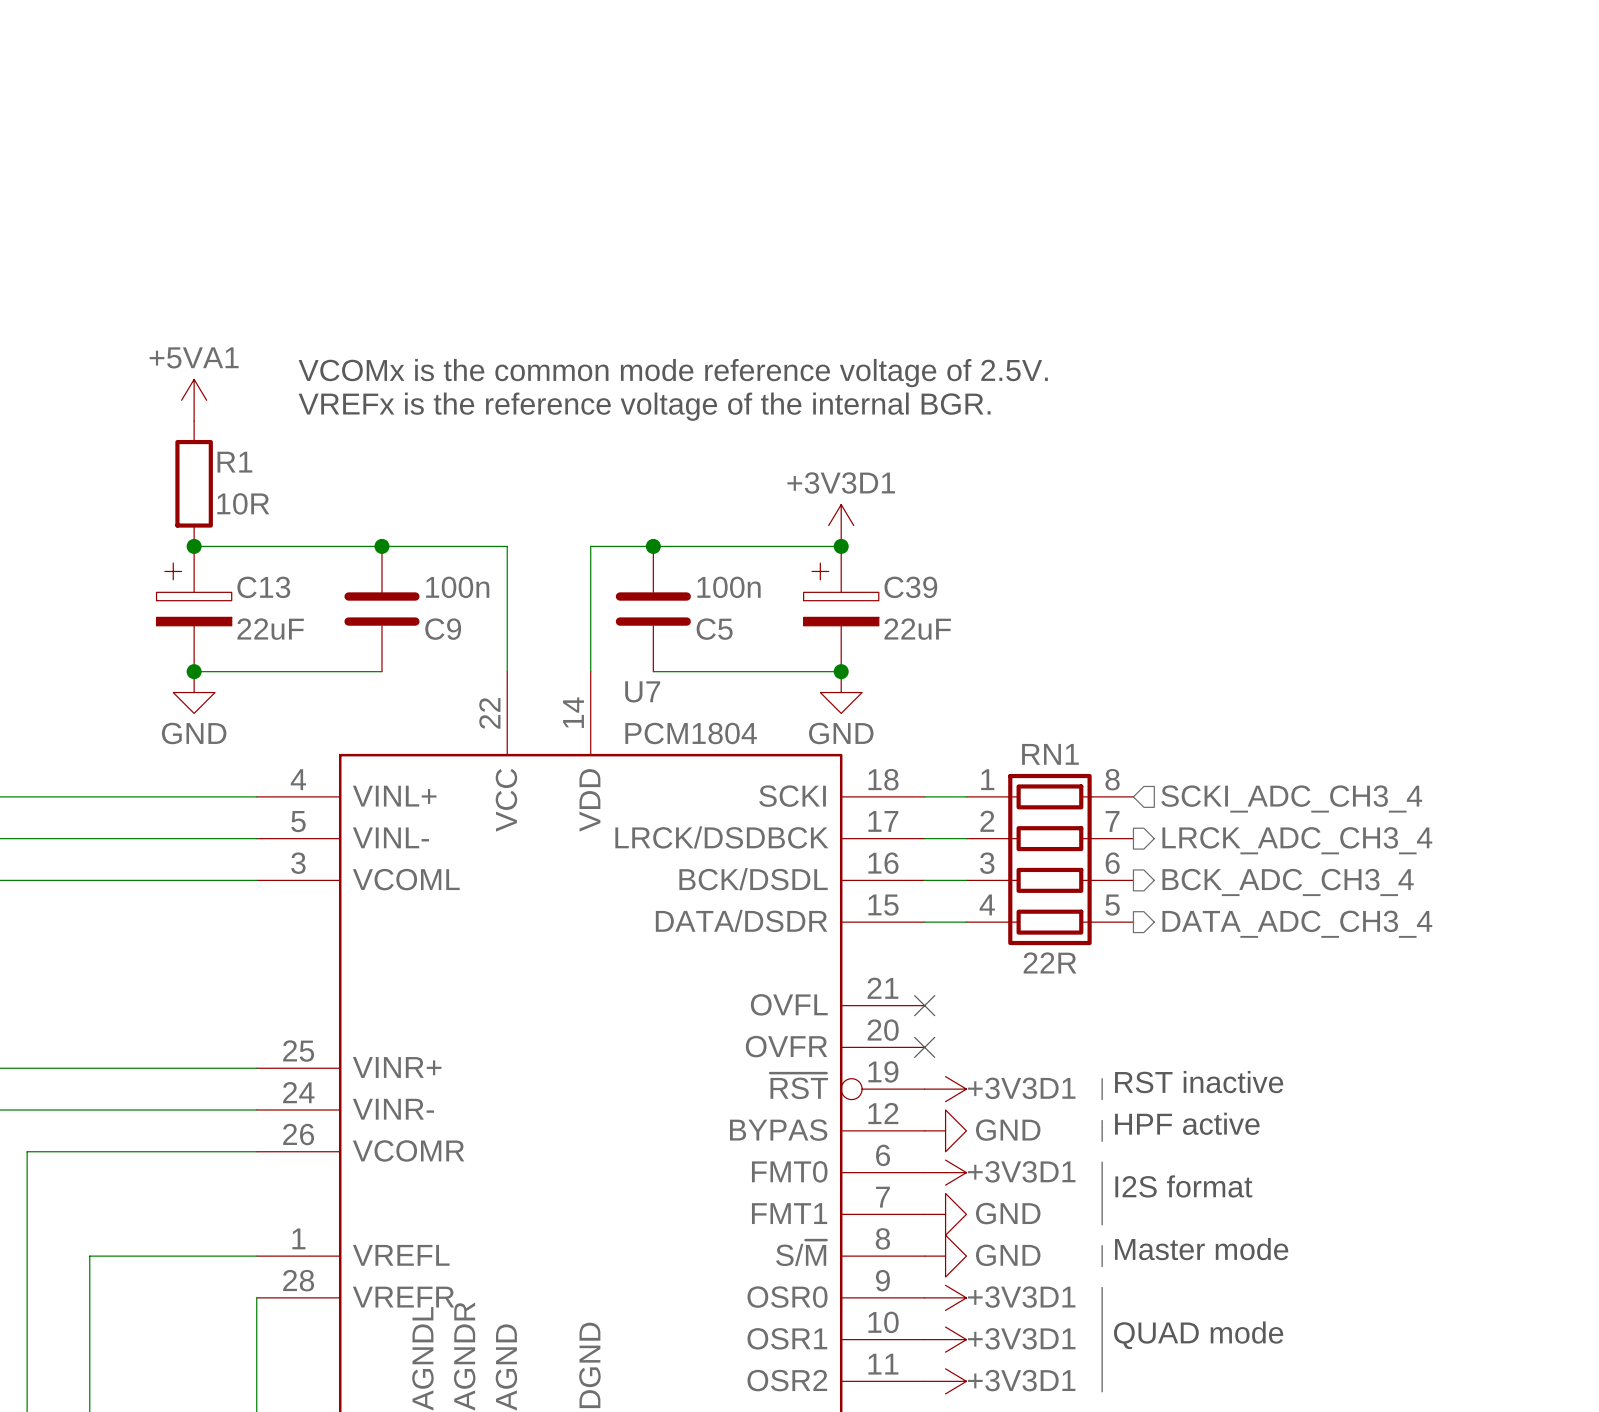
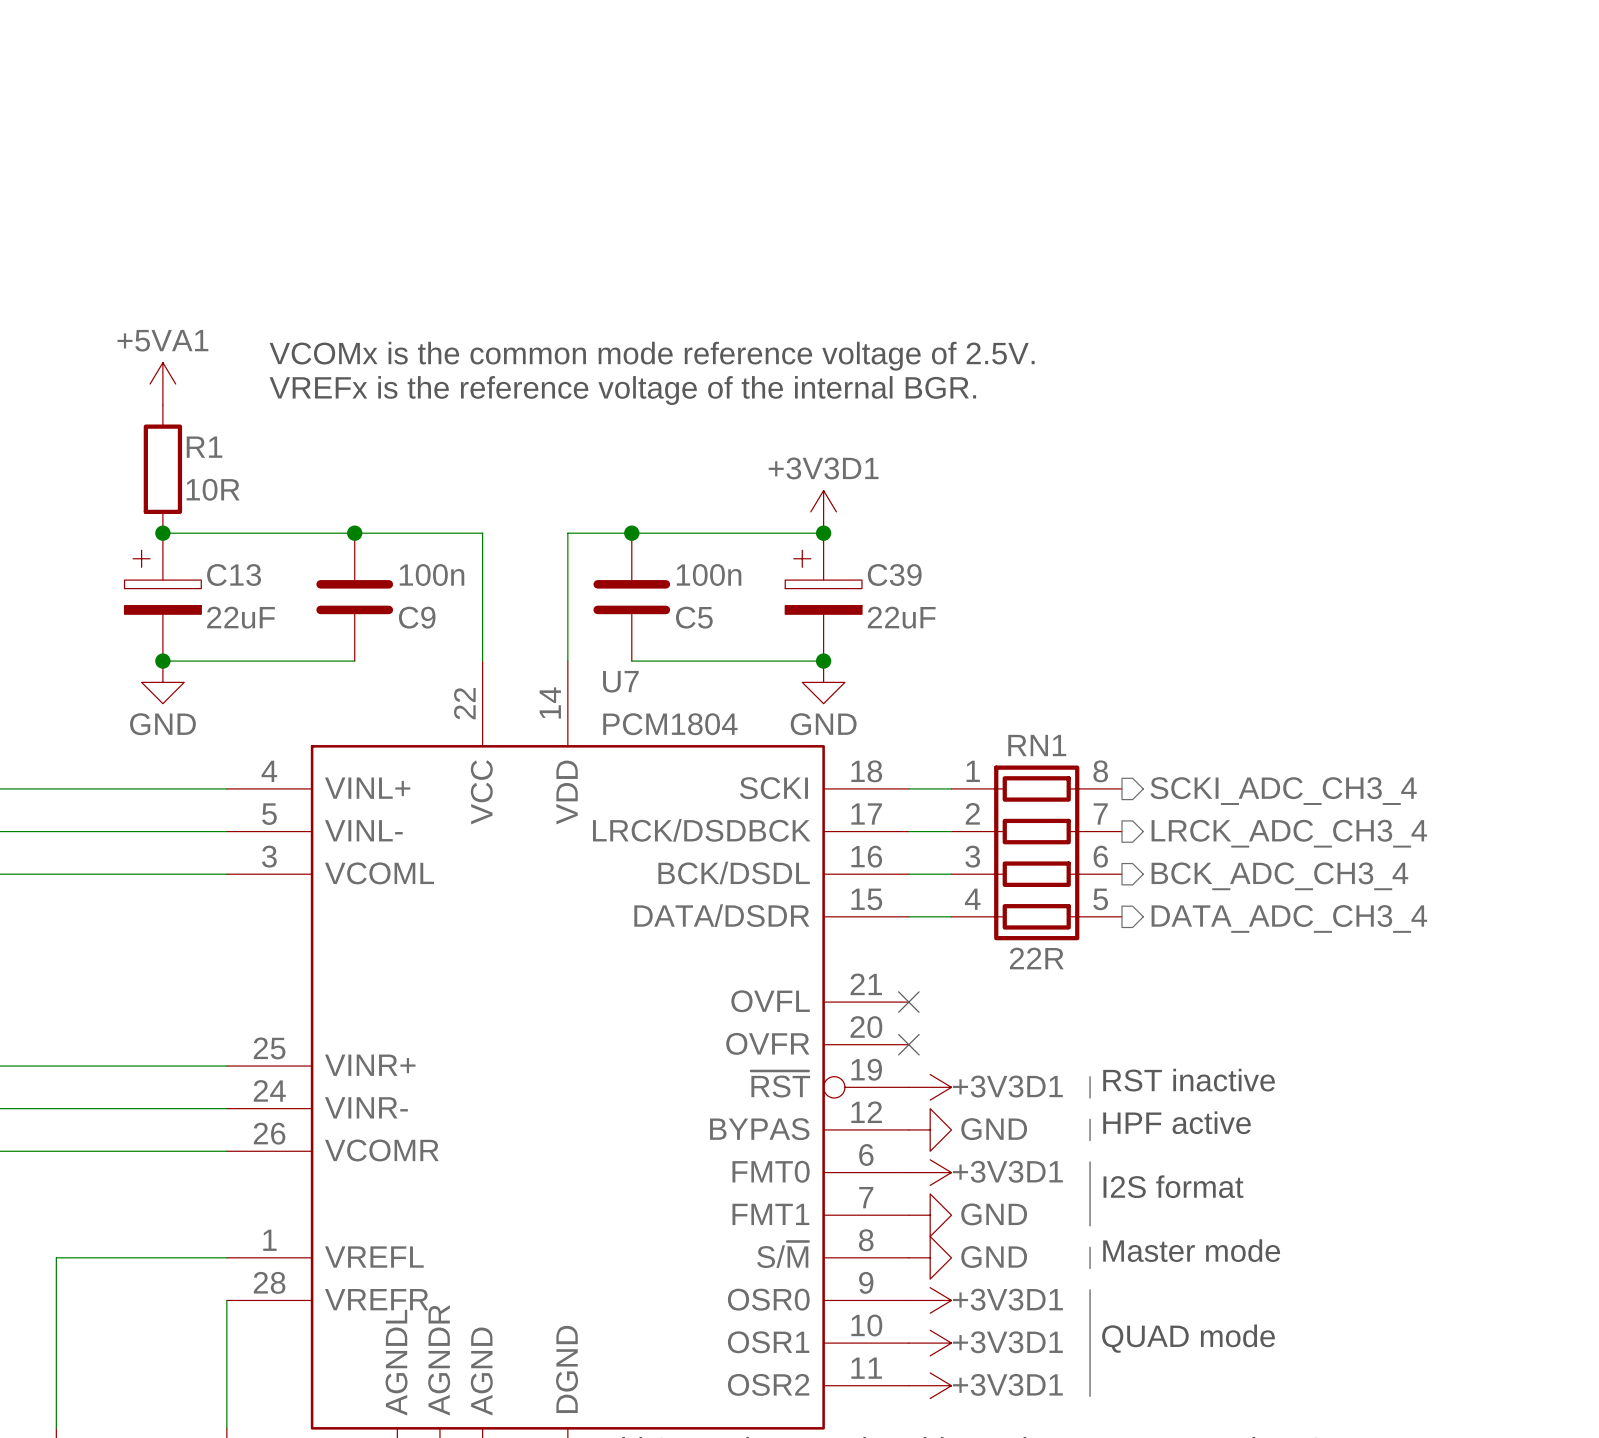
hierarchical label shape: input (1291, 798) -> output (1283, 791)

